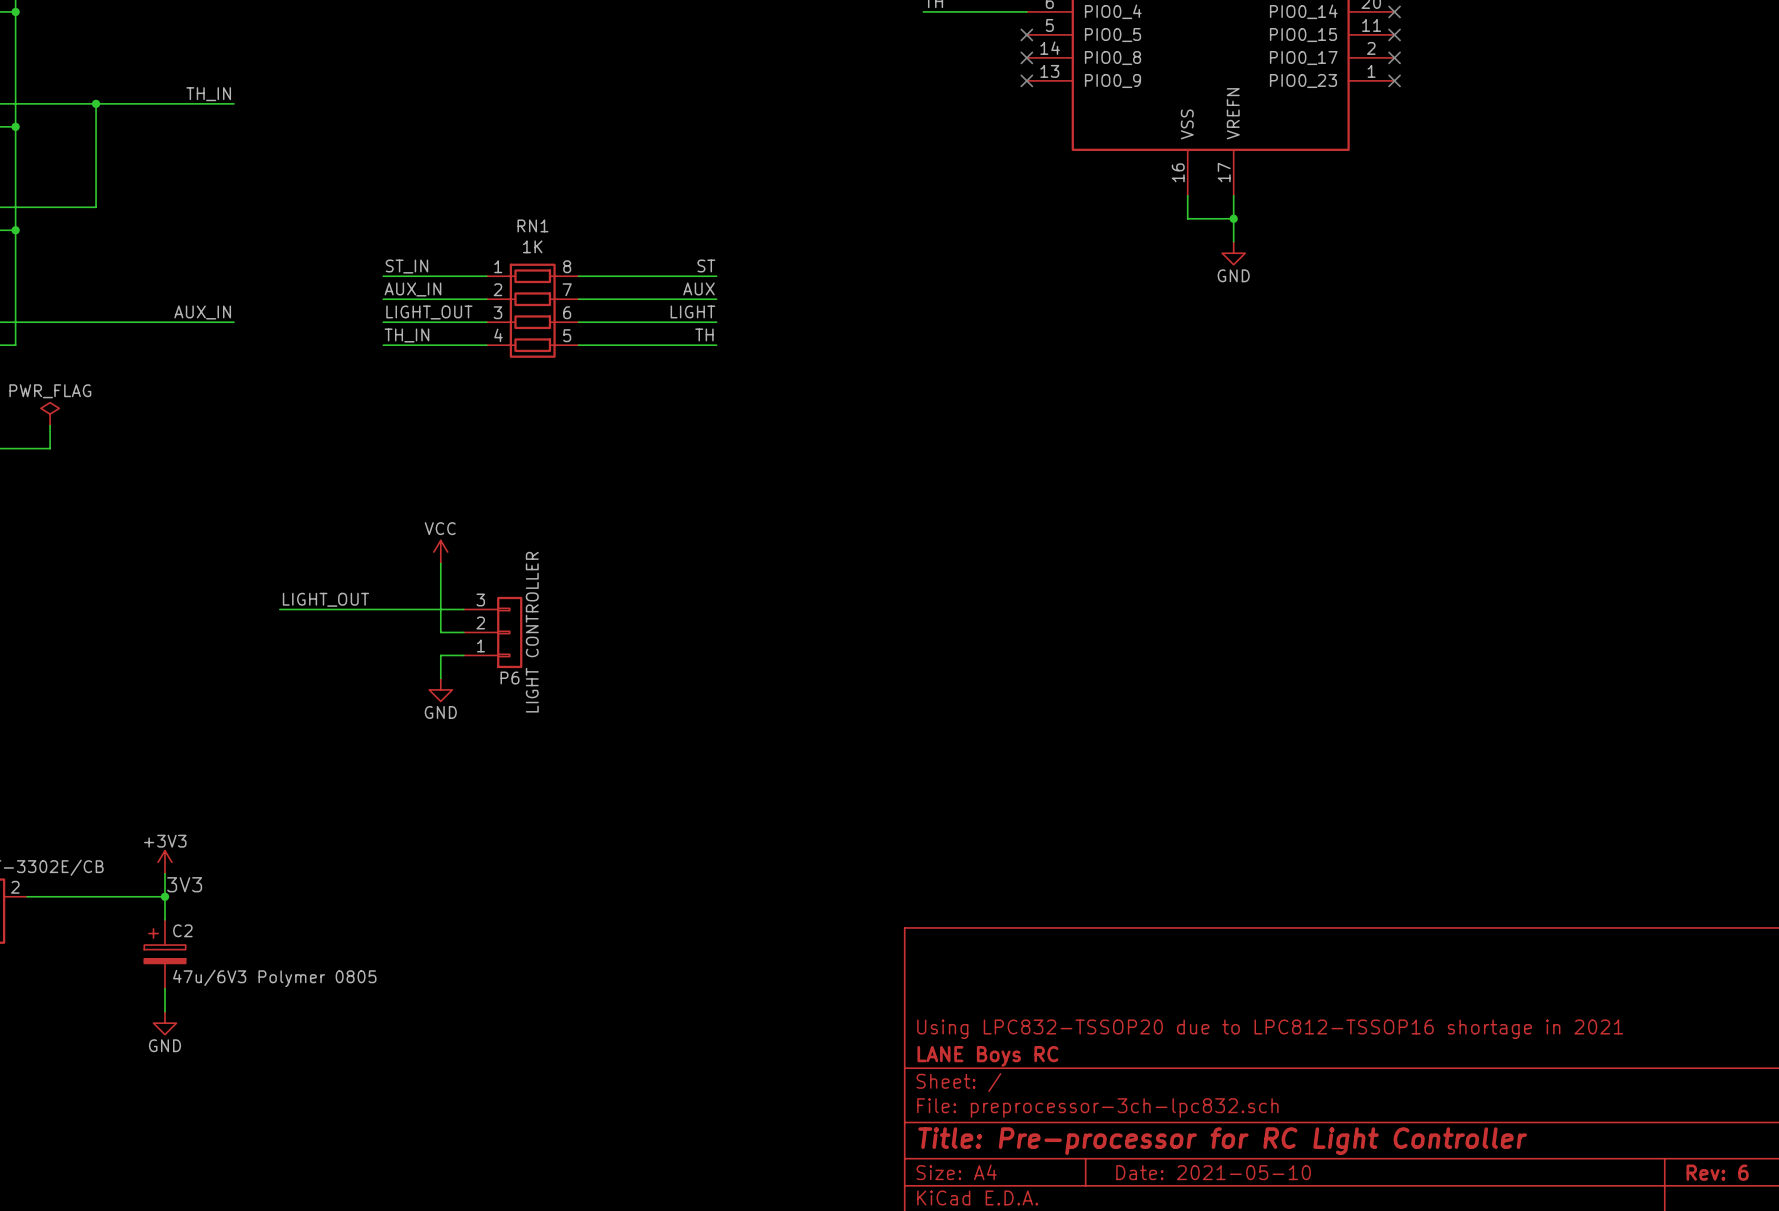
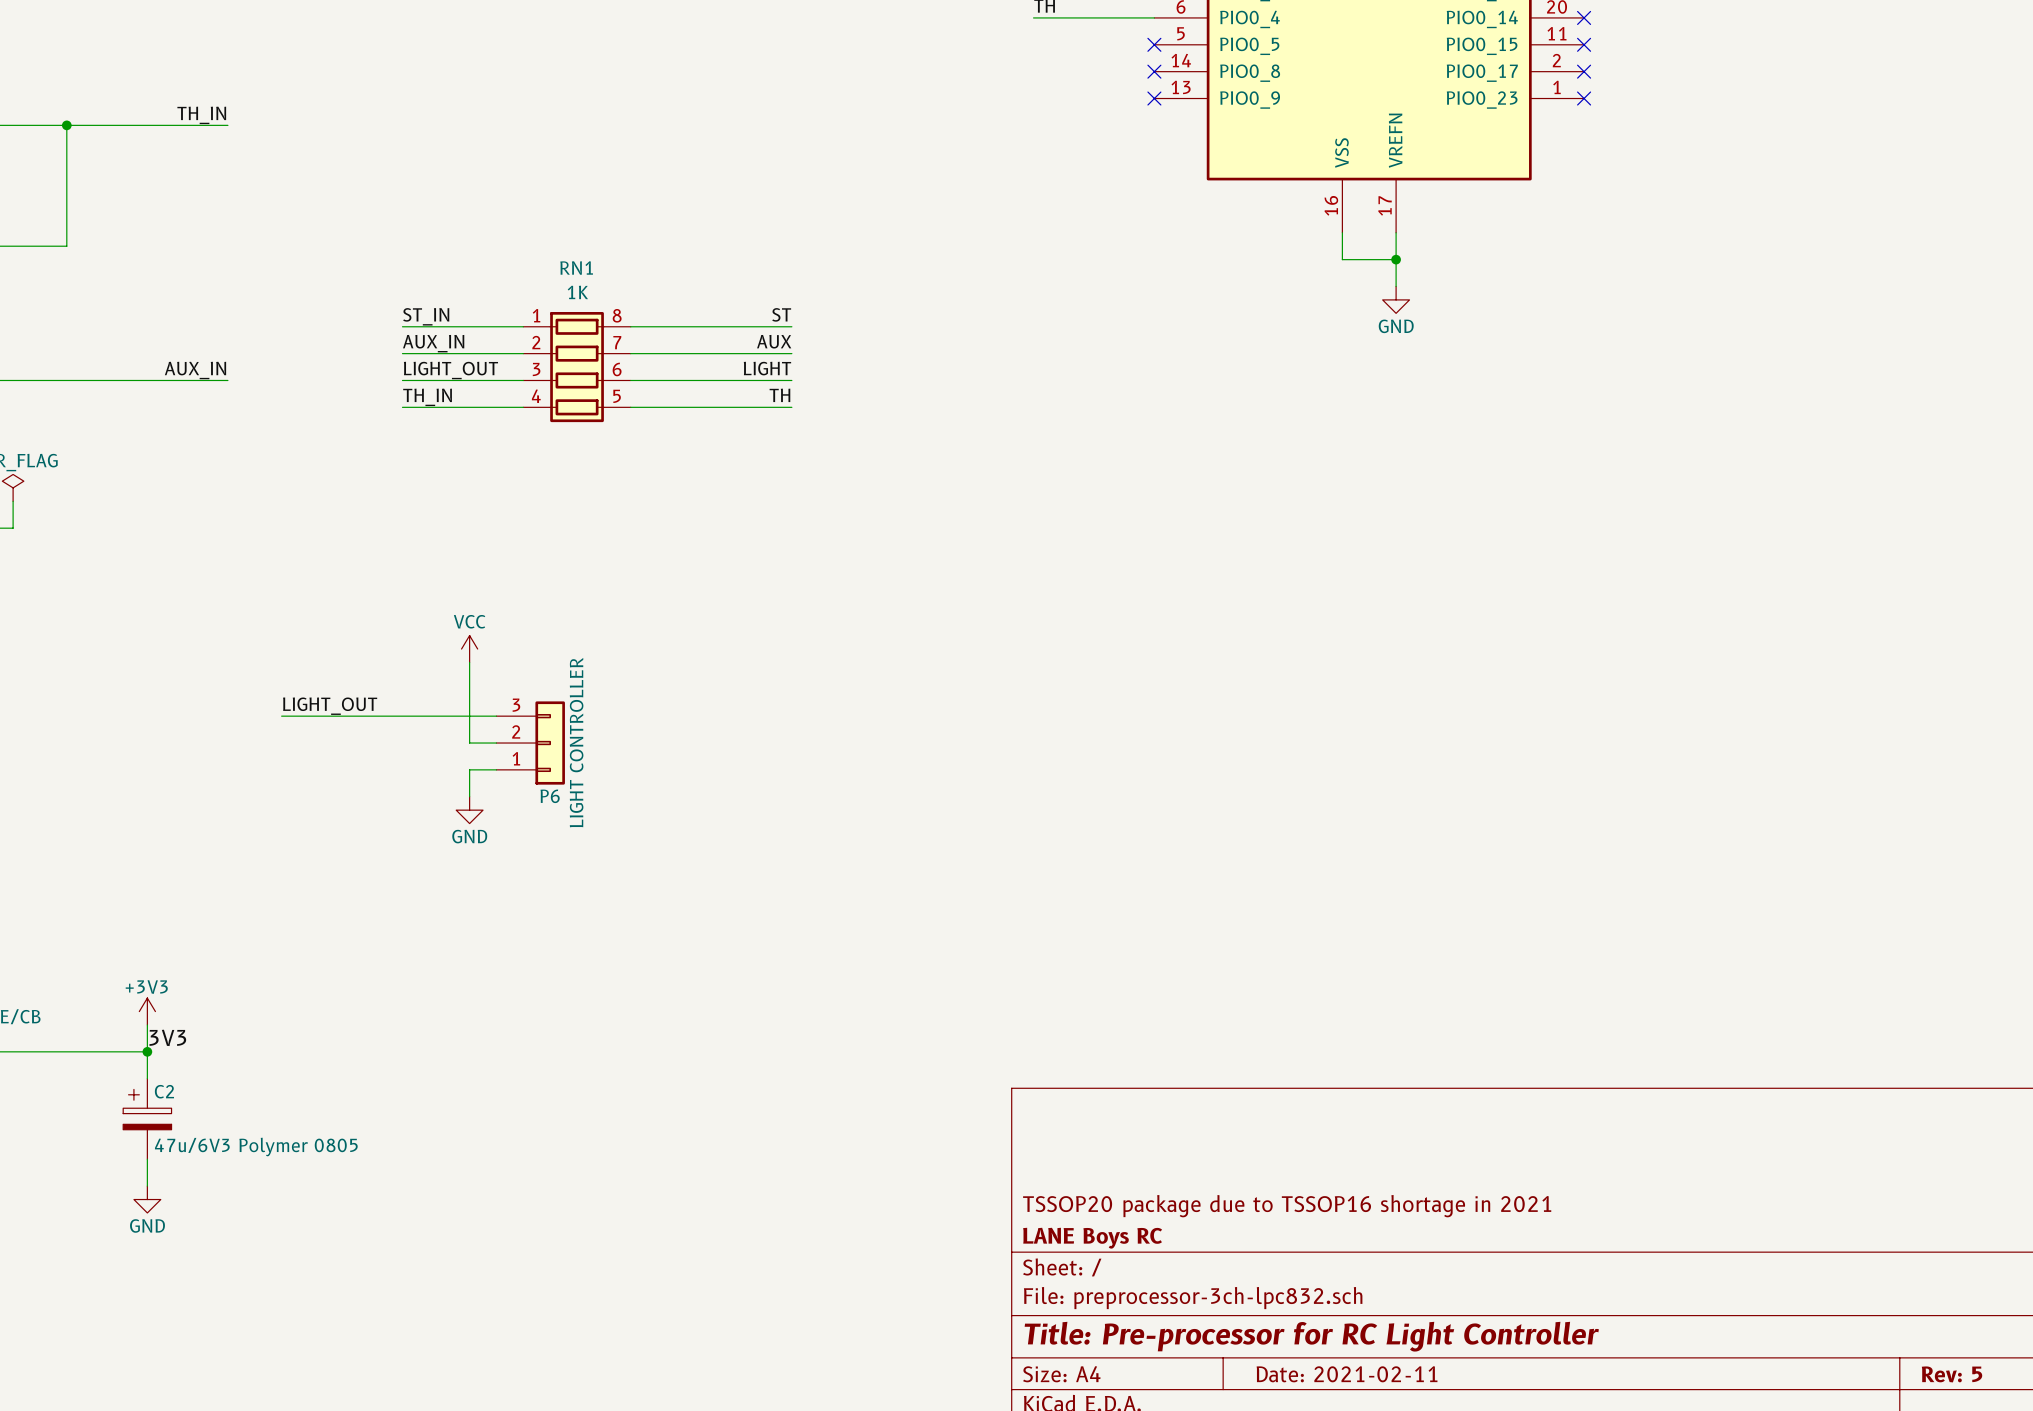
title block: Using LPC832-TSSOP20 due to LPC812-TSSOP16 shortage in 2021 (1270, 1029) -> TSSOP20 package due to TSSOP16 shortage in 2021 (1287, 1206)
title block: Date: 2021-05-10 (1213, 1172) -> Date: 2021-02-11 (1347, 1374)
title block: Rev: 6 (1717, 1172) -> Rev: 5 (1952, 1374)

